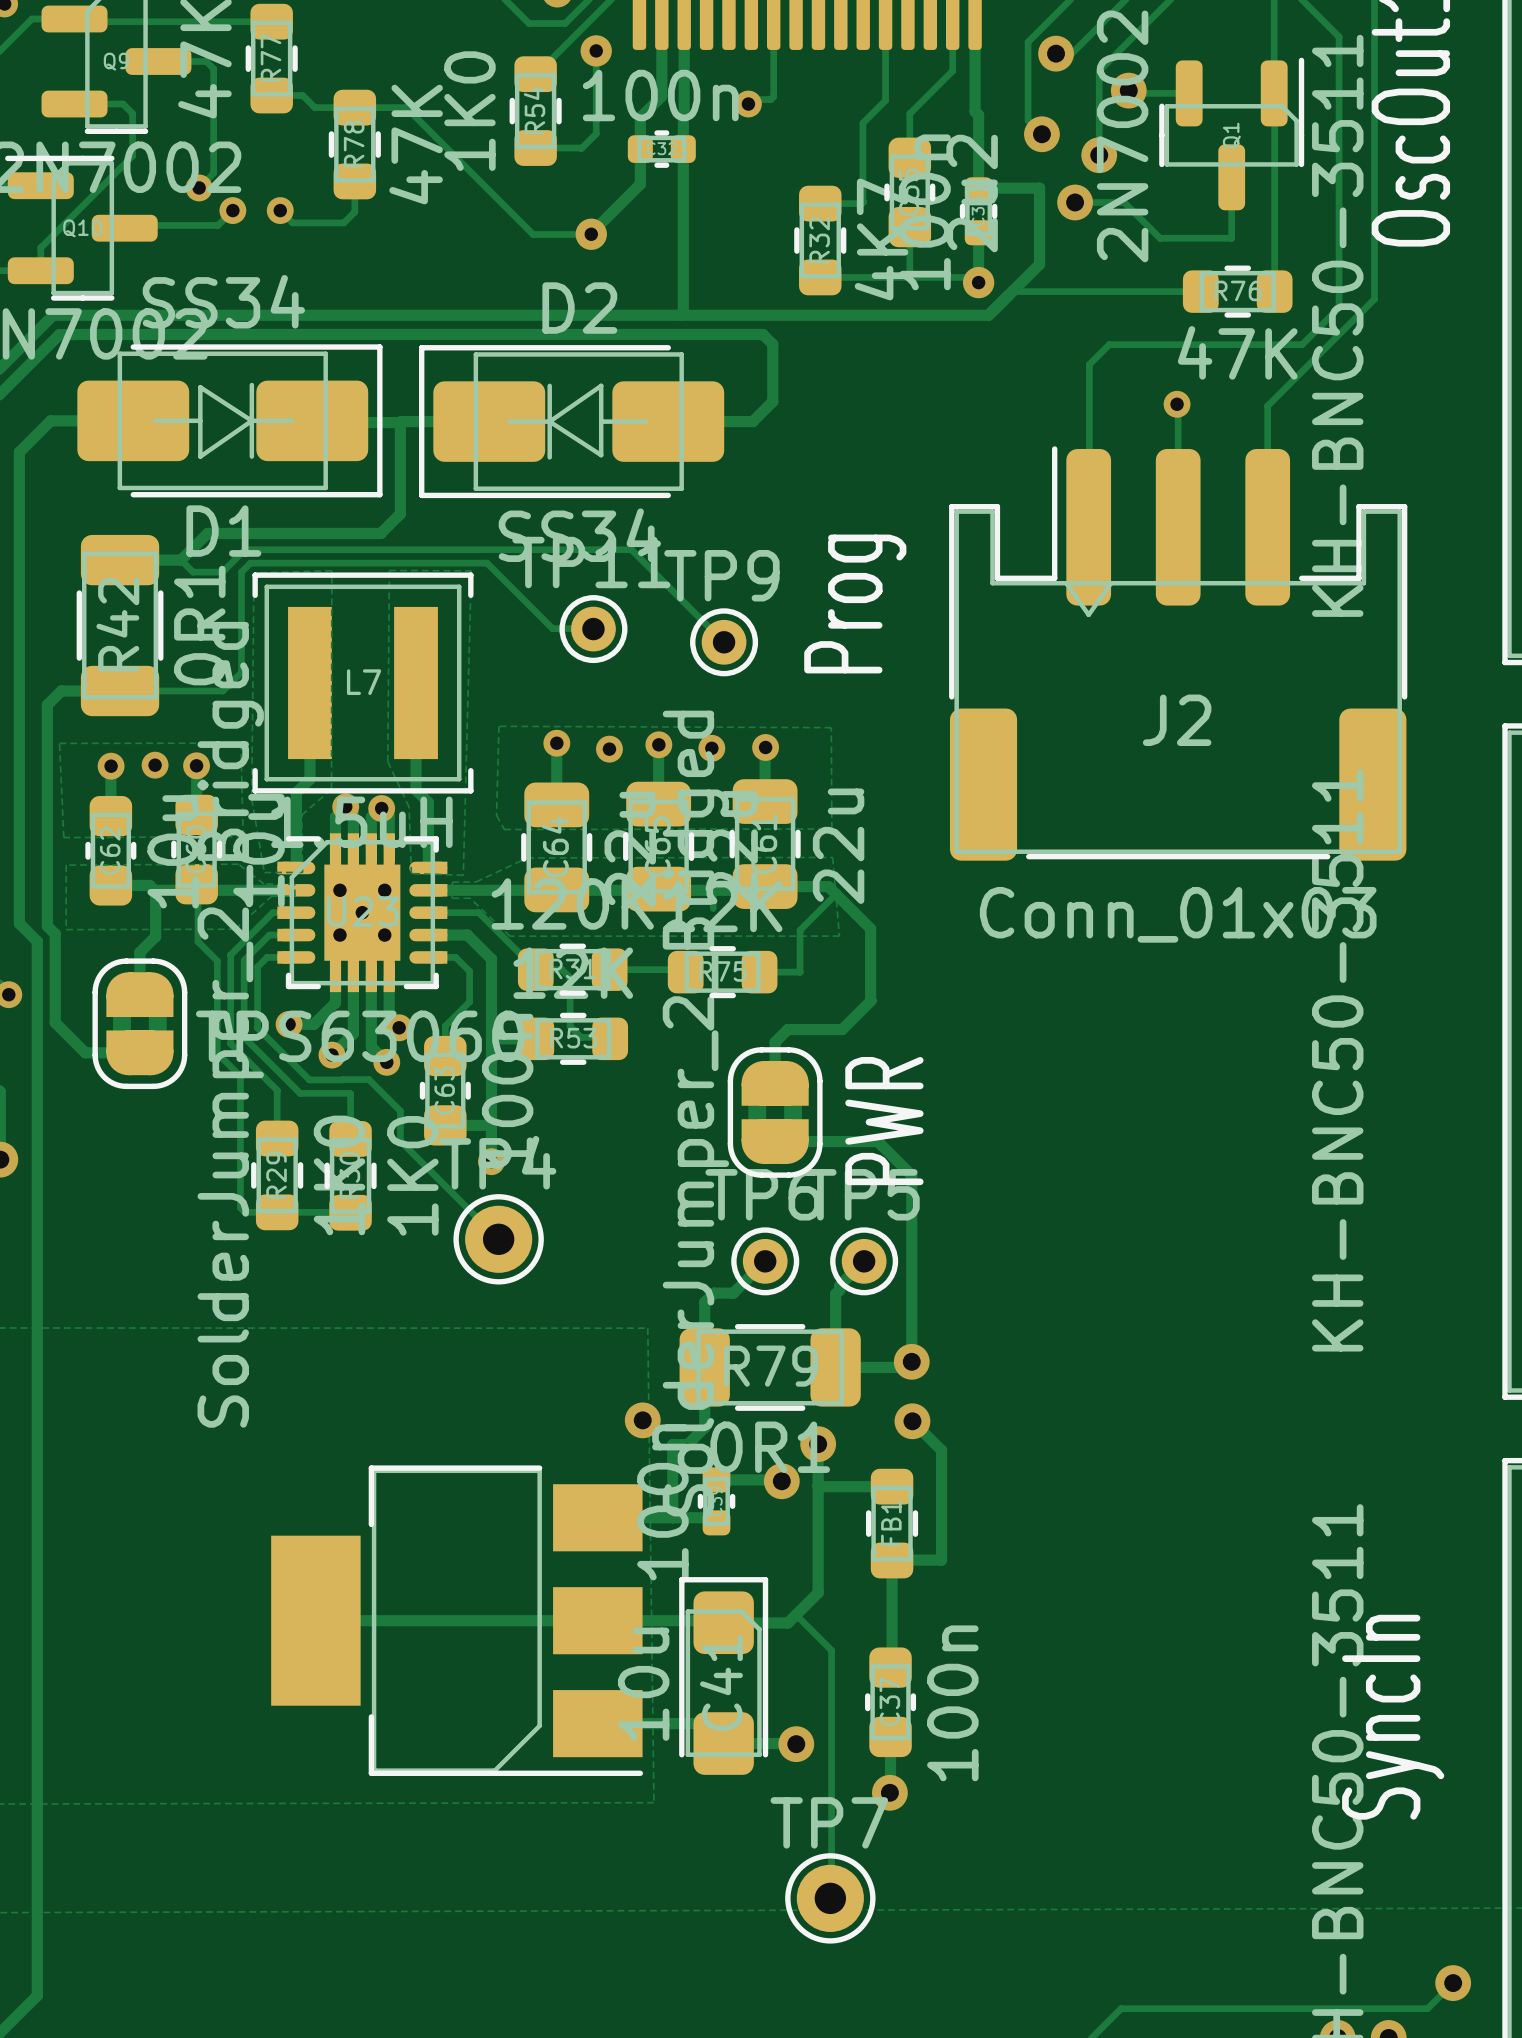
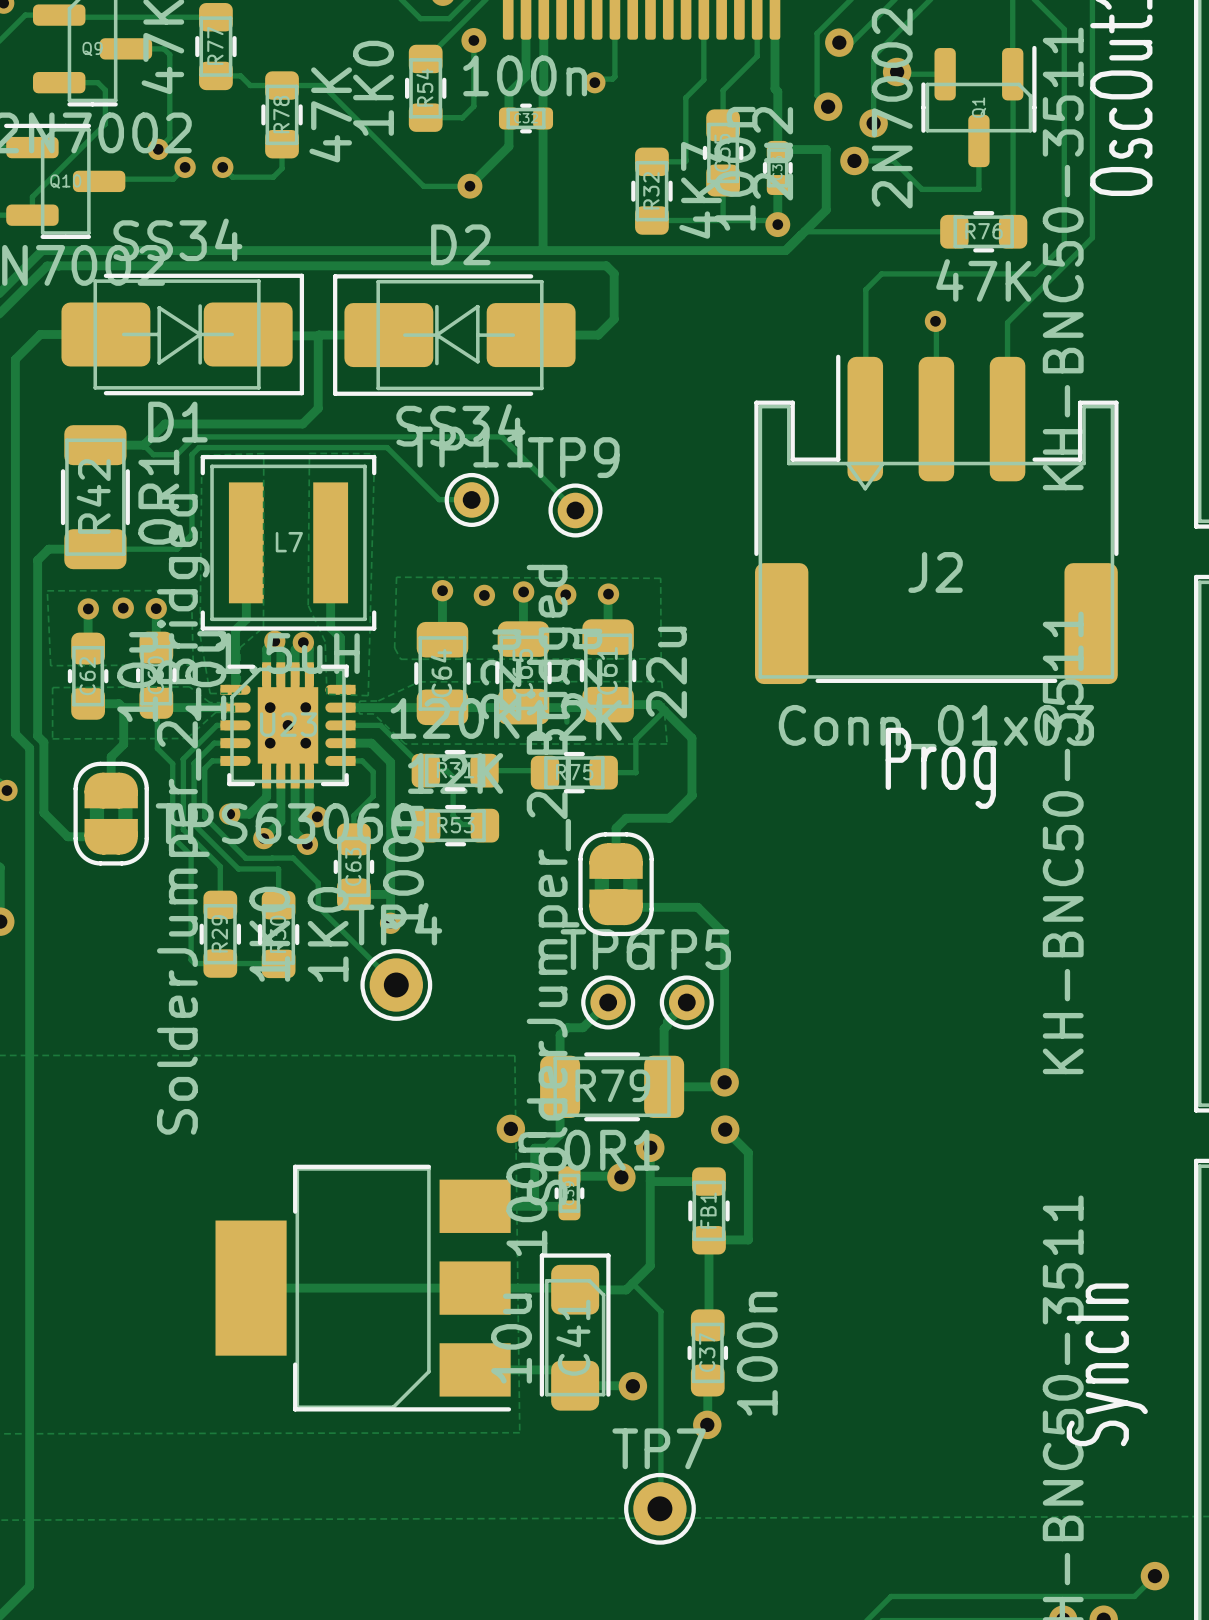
text rotation: 0° (855, 603) -> 90° clockwise (940, 768)
text position: Prog (855, 603) -> Prog (940, 768)
text: PWR (884, 1121) -> none

